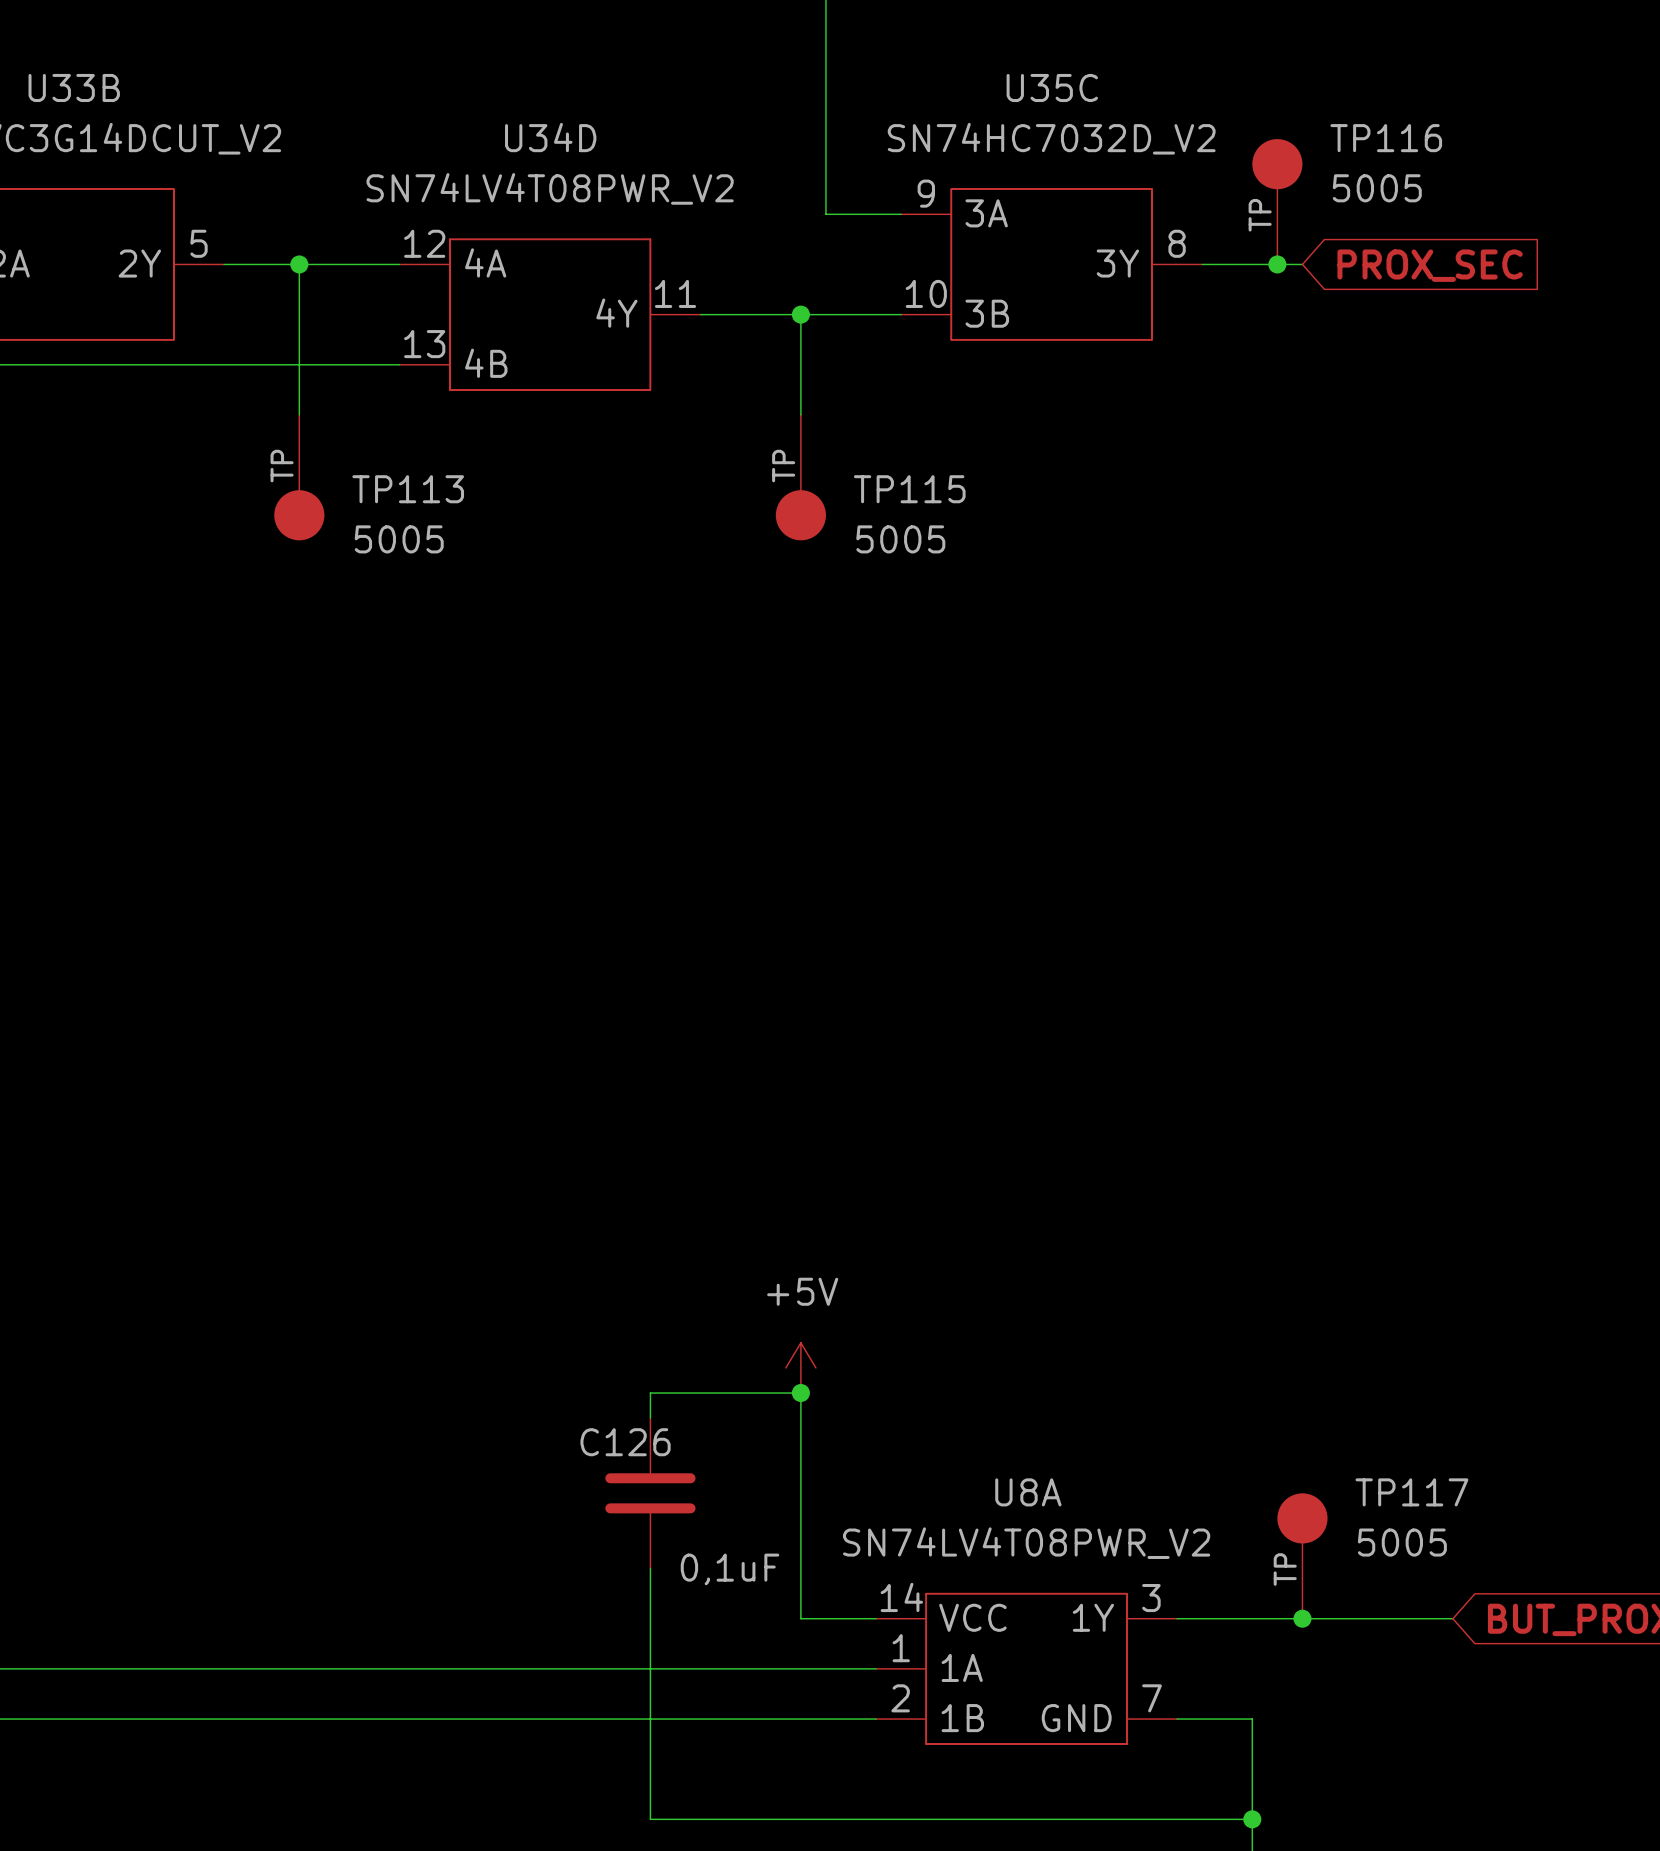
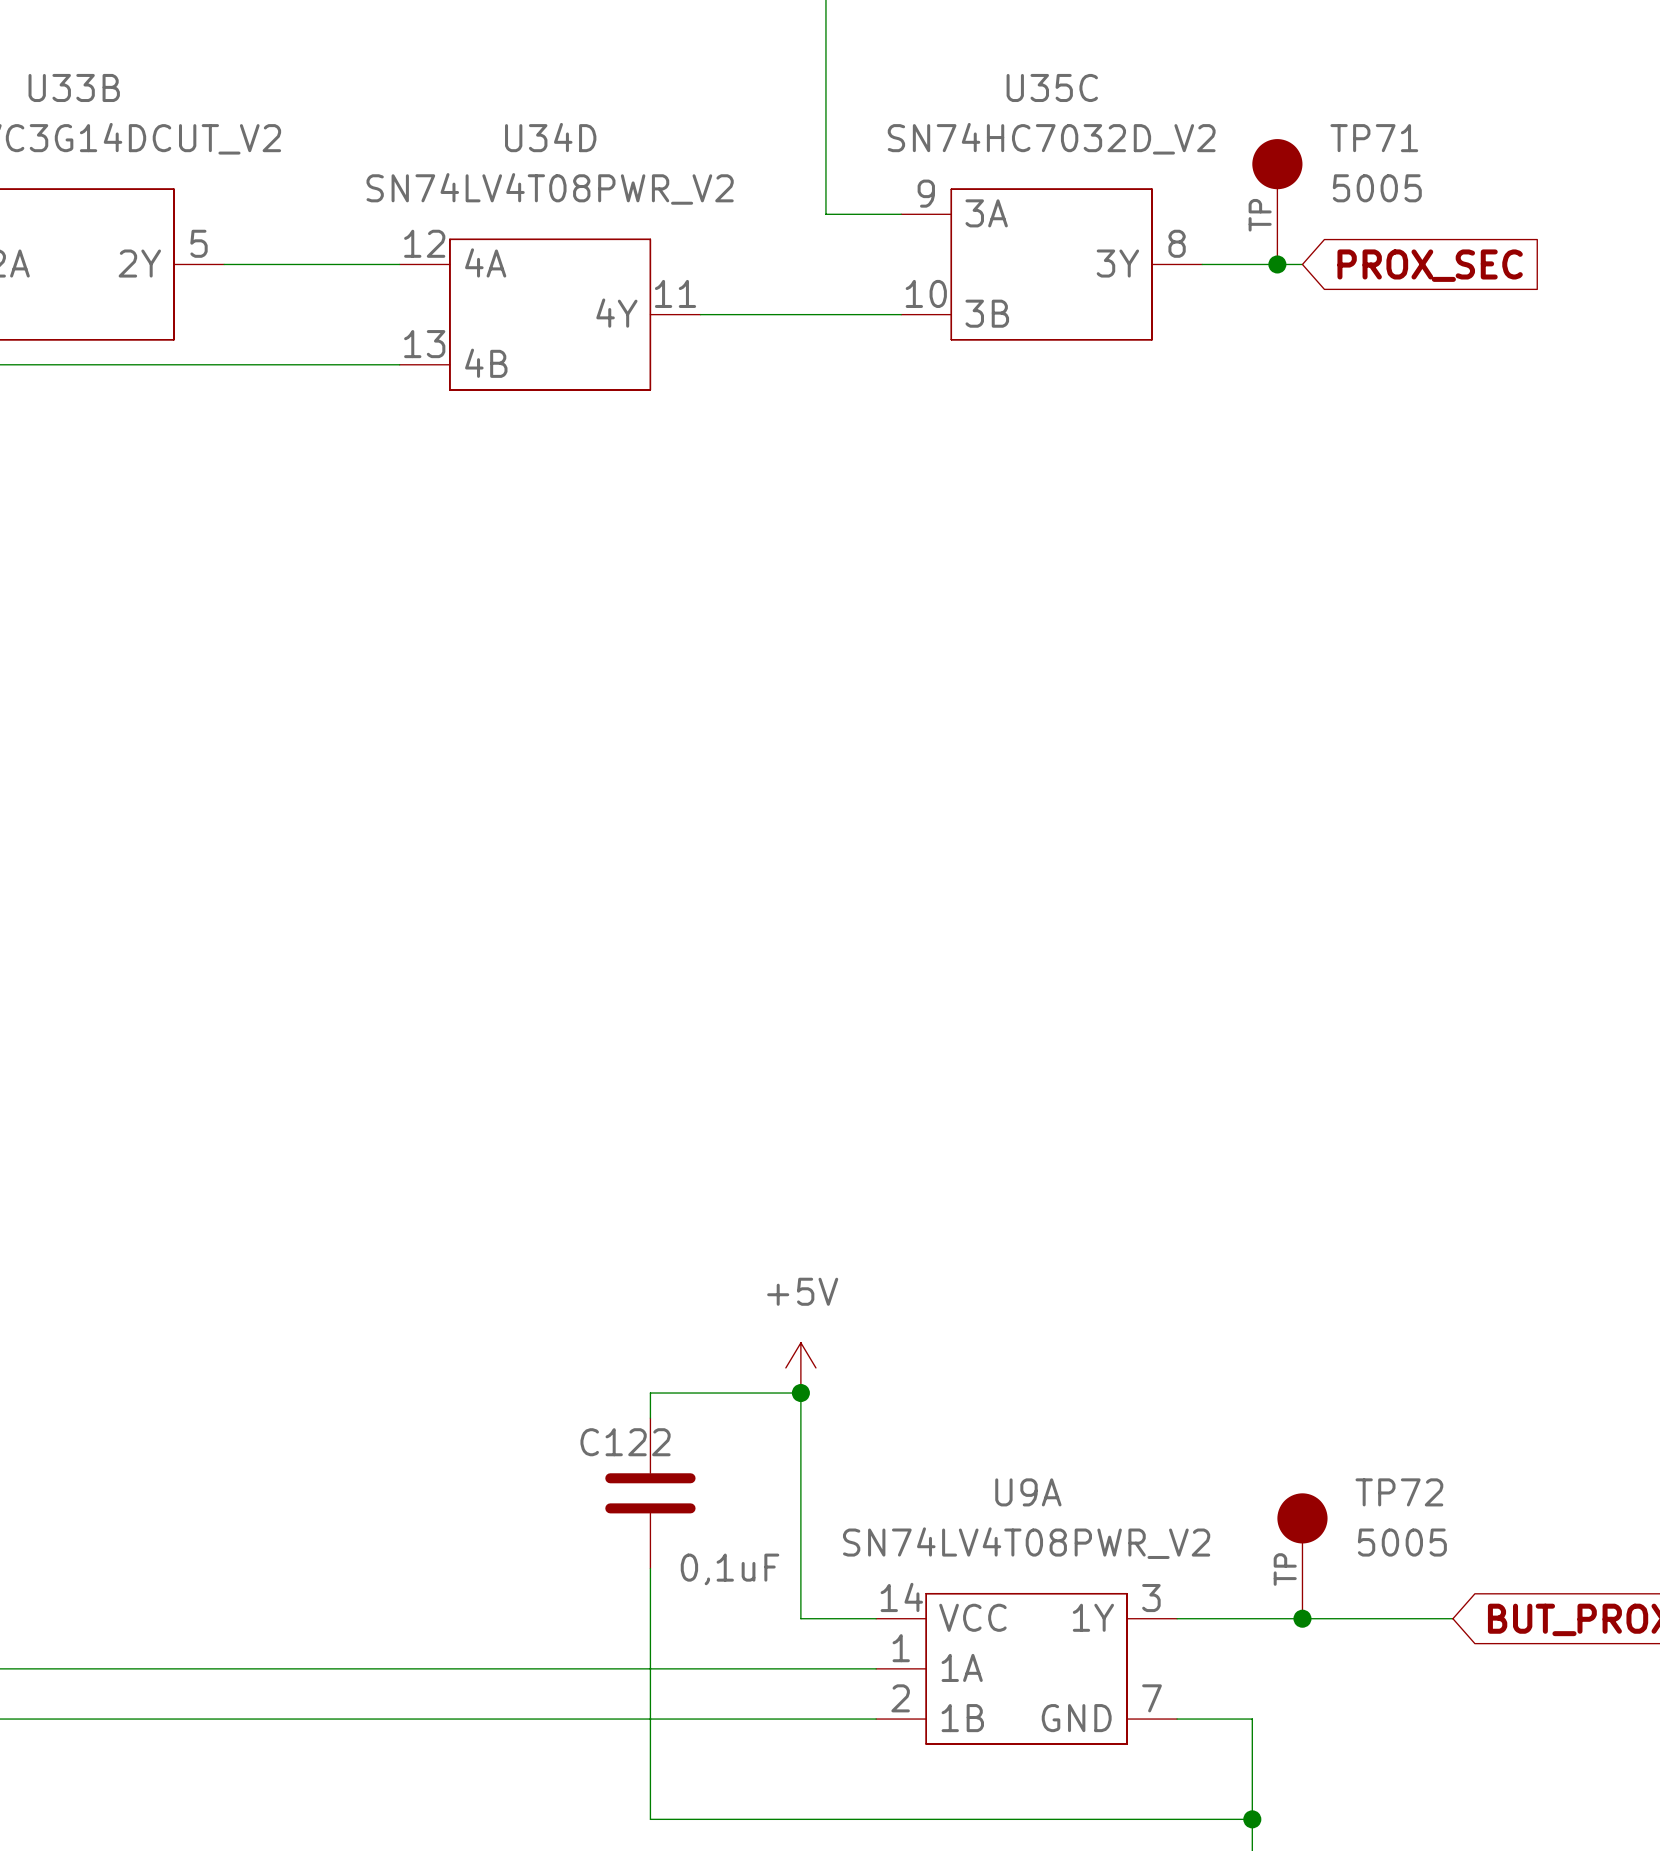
TP116 name: TP116 (1386, 138) -> TP71 (1374, 138)
wire: (299, 264) (299, 414) -> none
junction: (299, 264) -> none
wire: (800, 314) (800, 414) -> none
junction: (800, 314) -> none
TP113: 5005 (299, 477) -> none
TP115: 5005 (800, 477) -> none
C126 name: C126 (625, 1442) -> C122 (625, 1442)
U8A name: U8A (1028, 1492) -> U9A (1028, 1492)
TP117 name: TP117 (1411, 1492) -> TP72 (1399, 1492)

